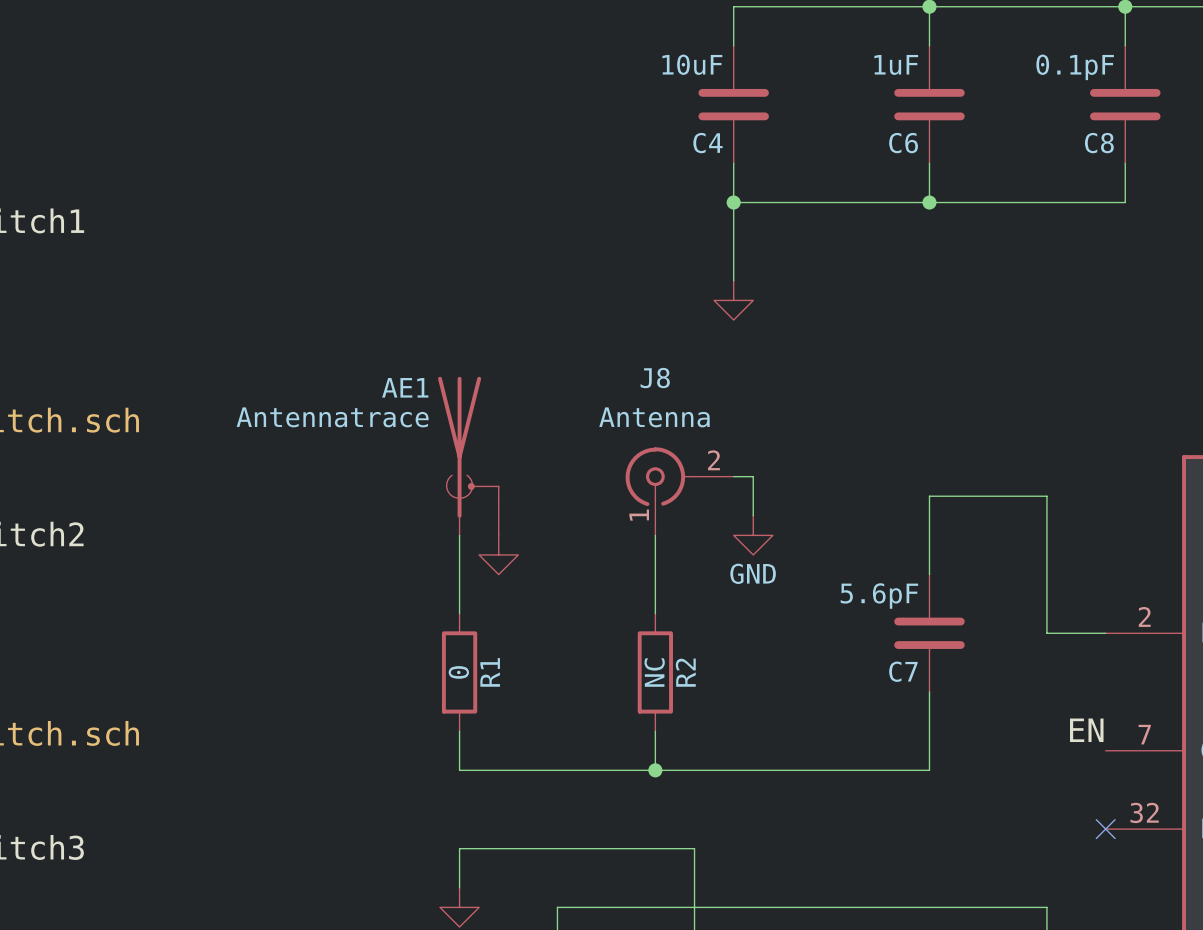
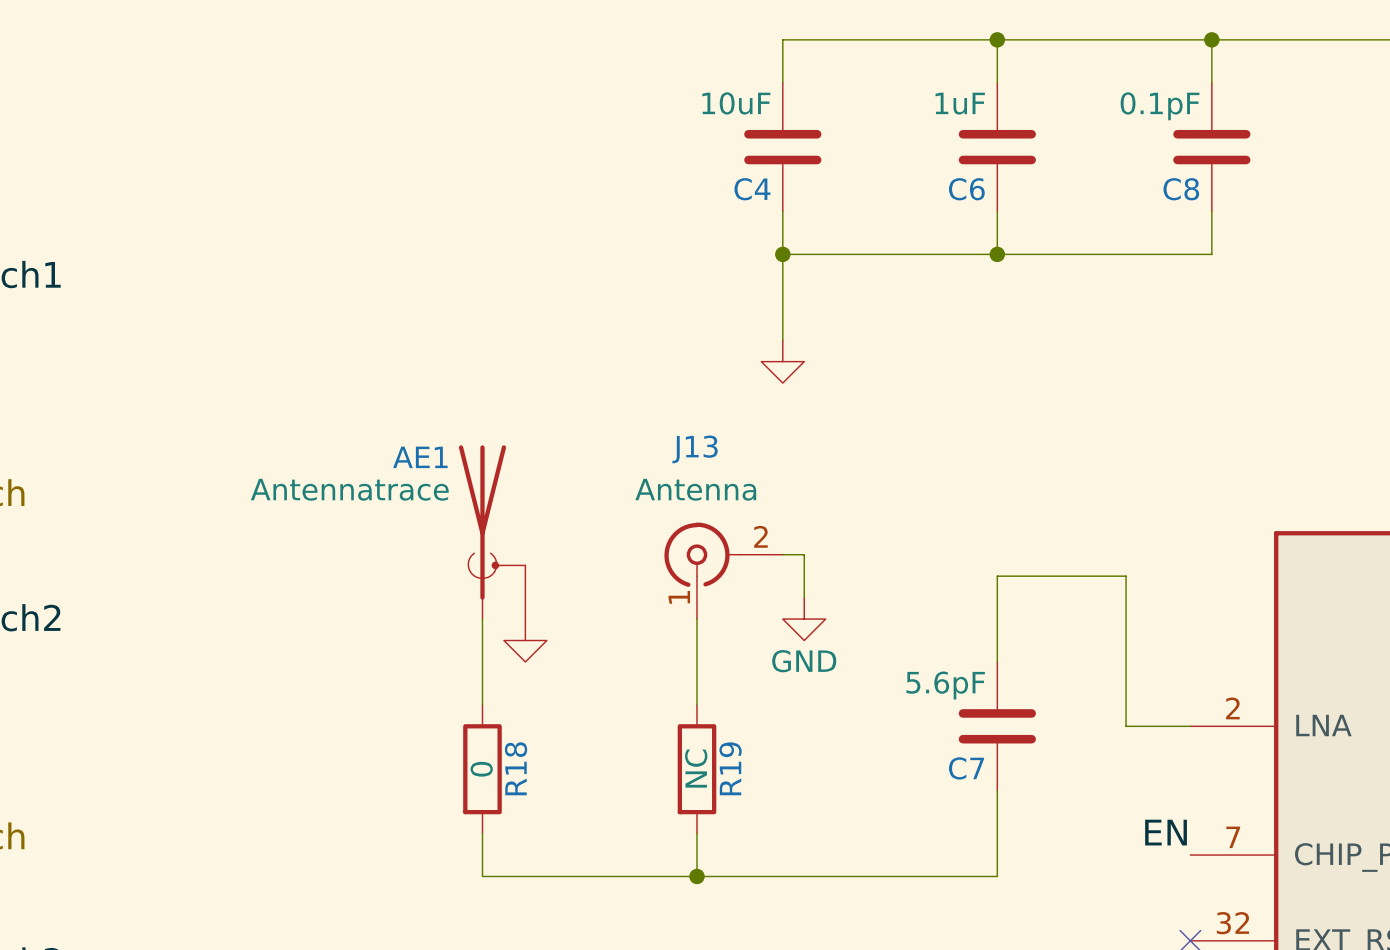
J8 name: J8 (655, 378) -> J13 (695, 449)
R1 name: R1 (490, 672) -> R18 (516, 768)
R2 name: R2 (685, 672) -> R19 (730, 768)

